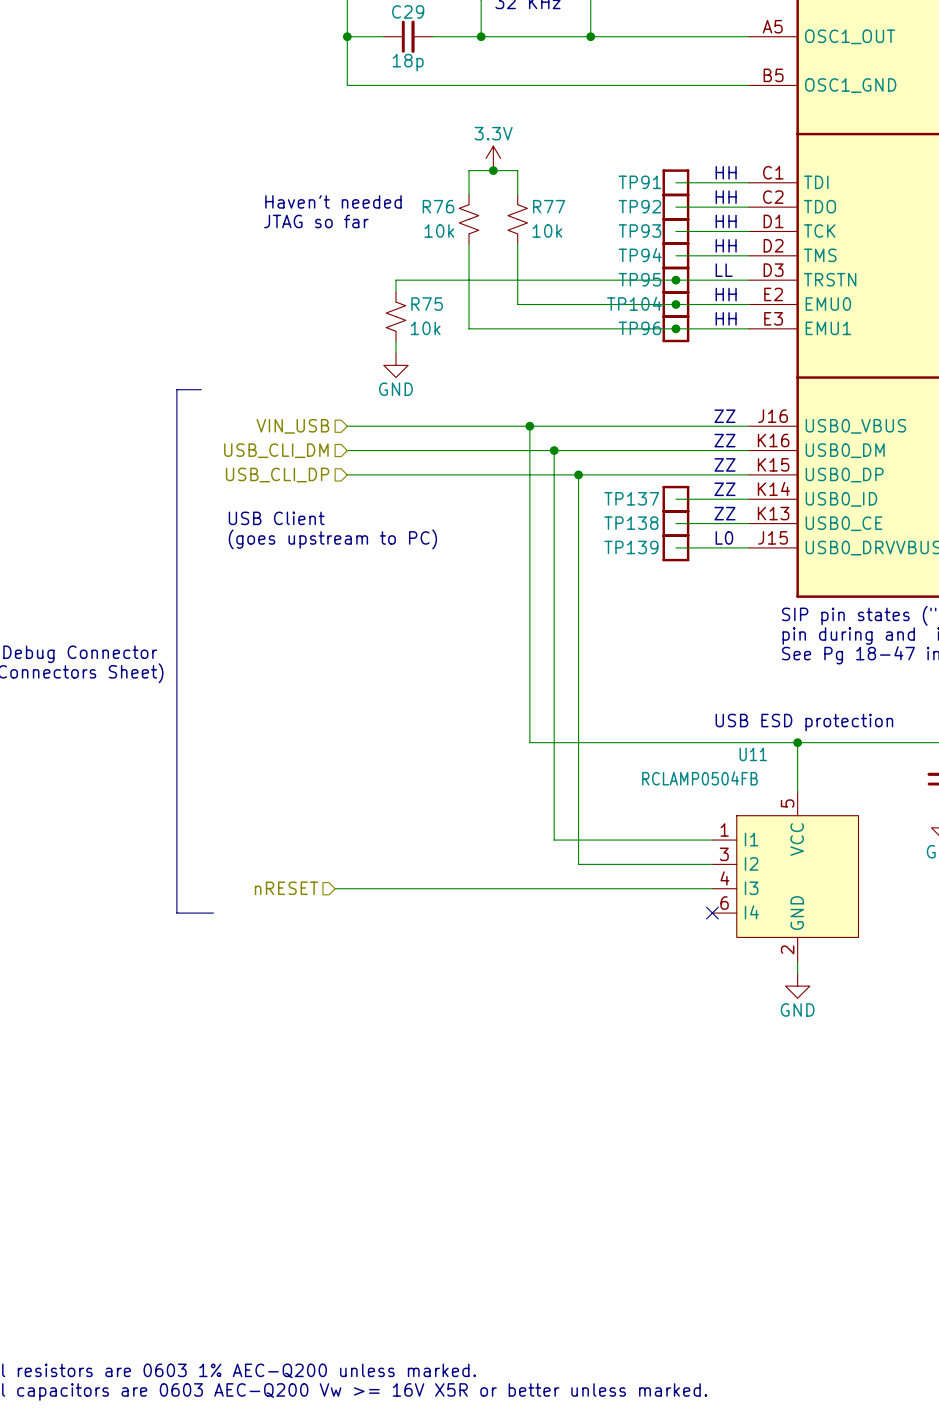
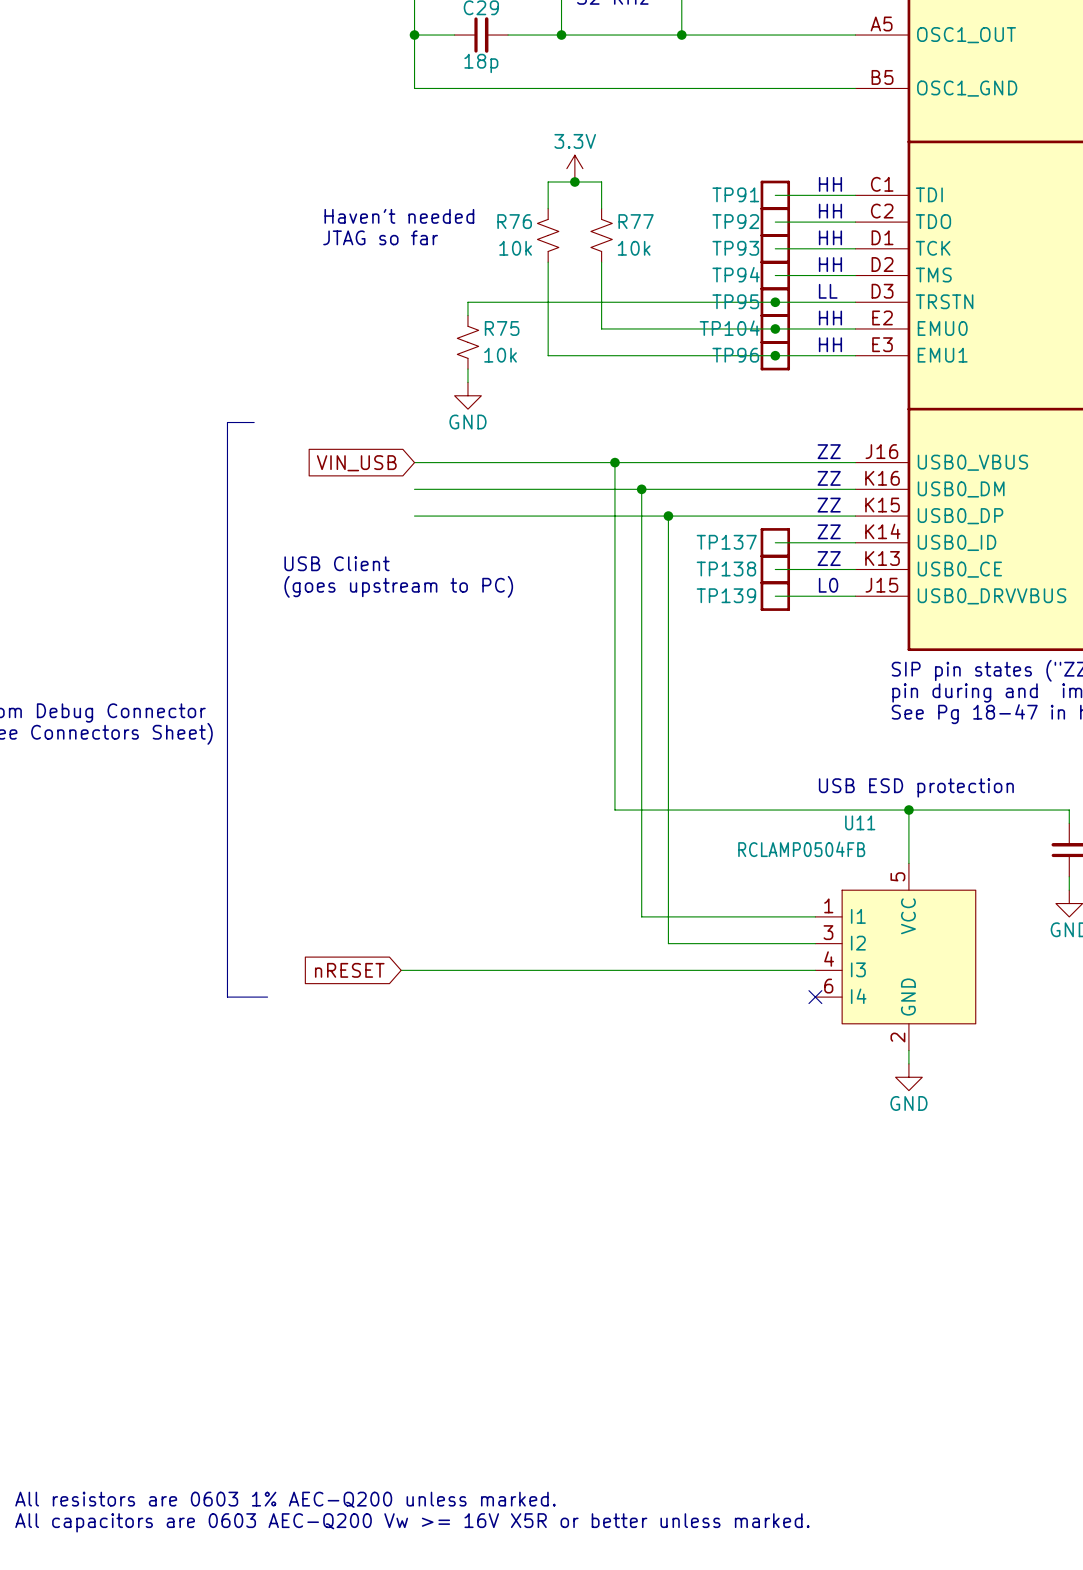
hierarchical label: VIN_USB (292, 426) -> none
global label: none -> VIN_USB (356, 463)
hierarchical label: USB_CLI_DM (276, 450) -> none
hierarchical label: USB_CLI_DP (277, 475) -> none
hierarchical label: nRESET (286, 888) -> none
global label: none -> nRESET (349, 970)

